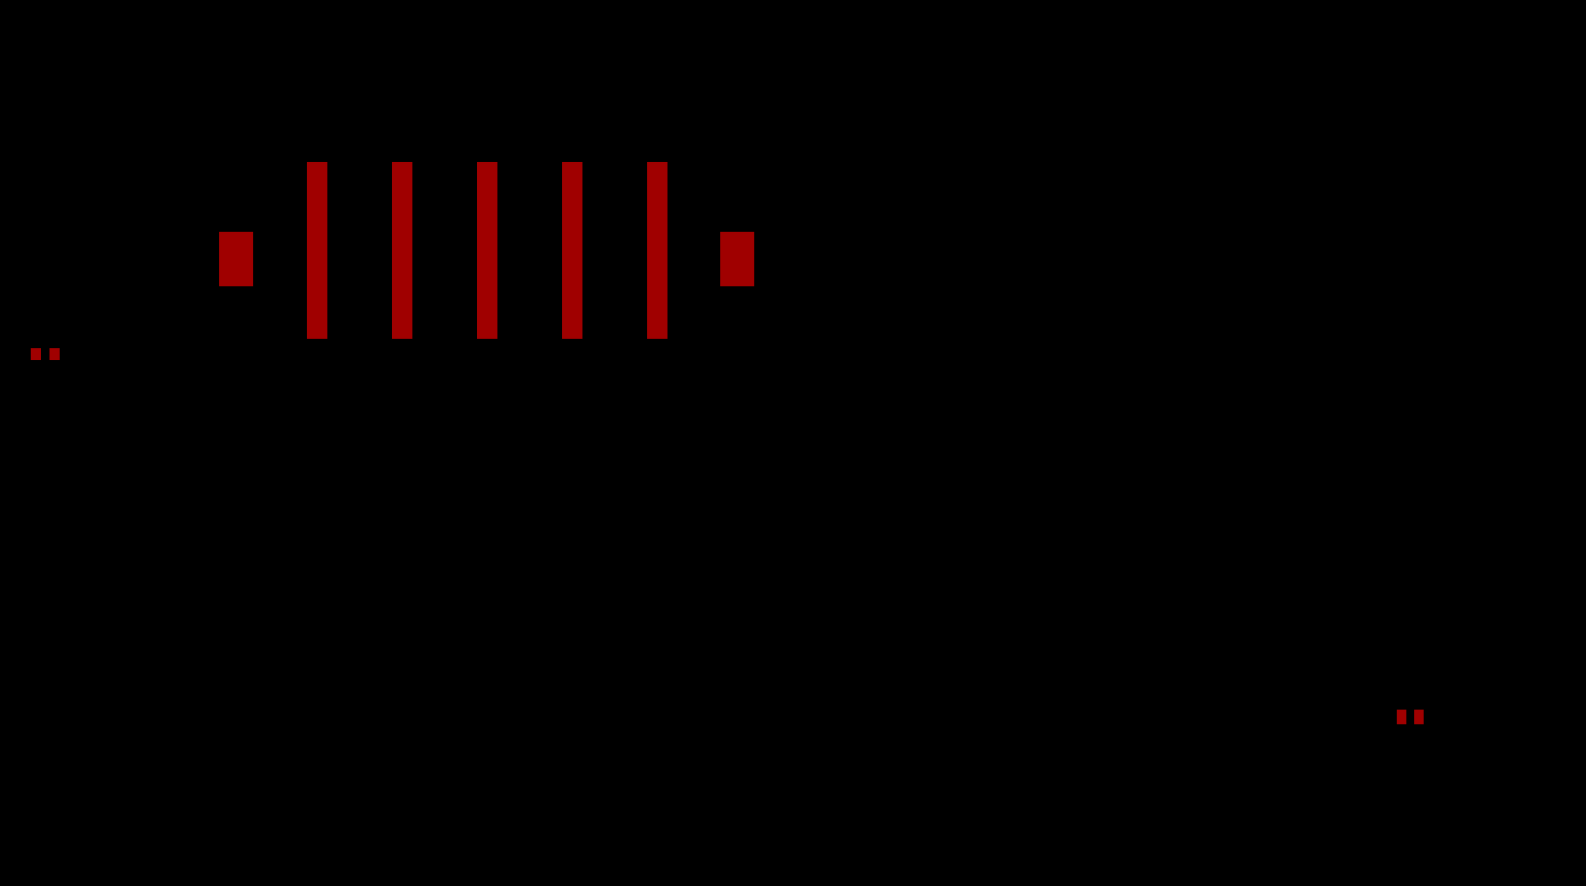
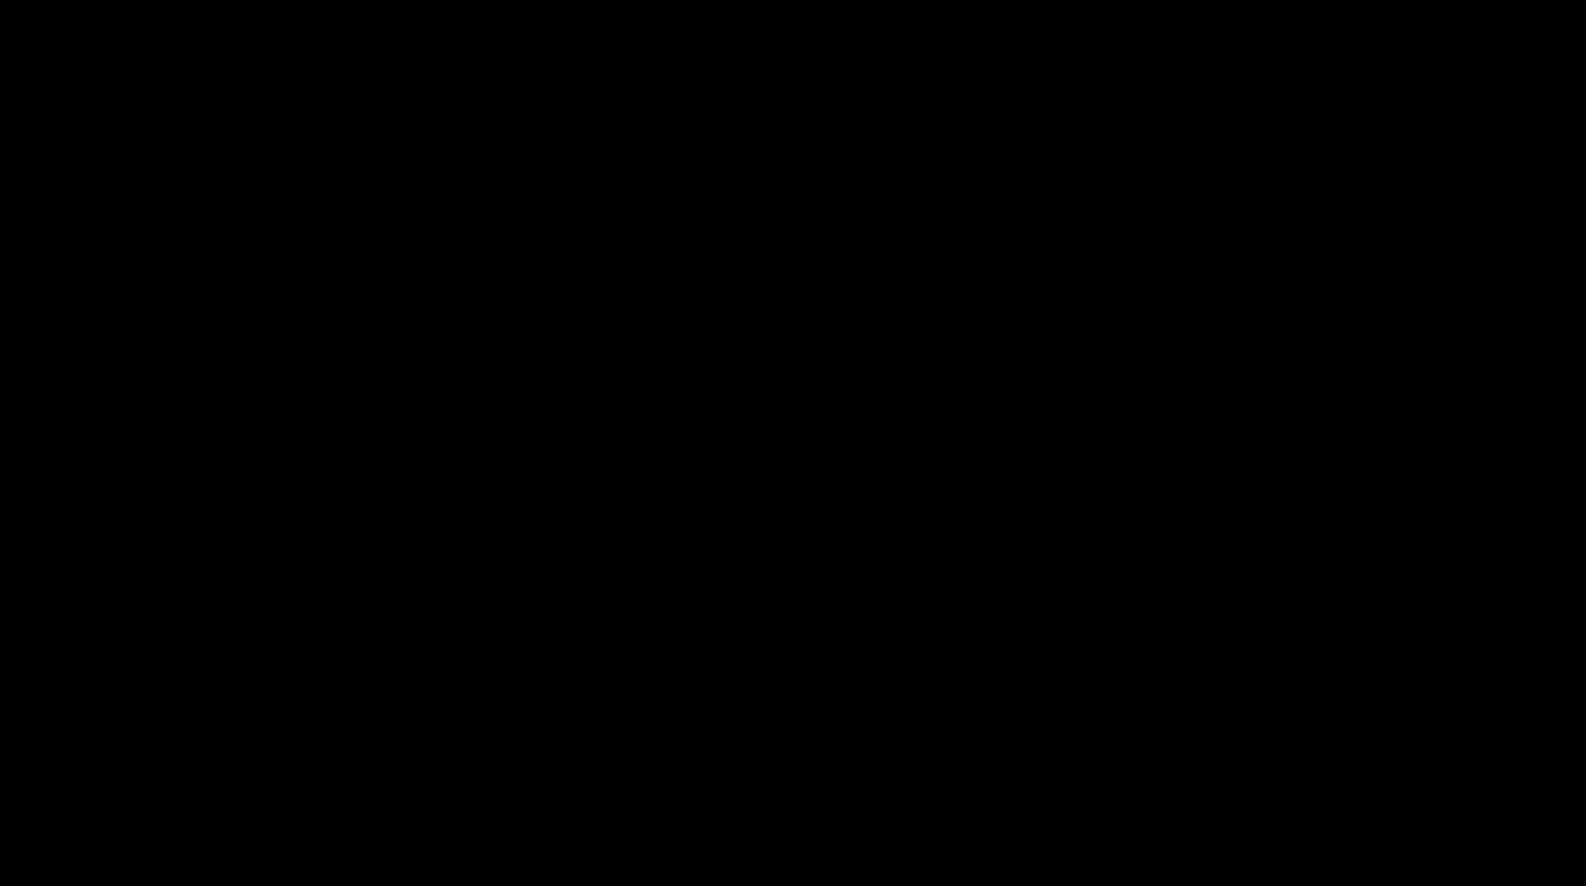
part: (486, 250) -> none
part: (45, 354) -> none
part: (1410, 716) -> none

